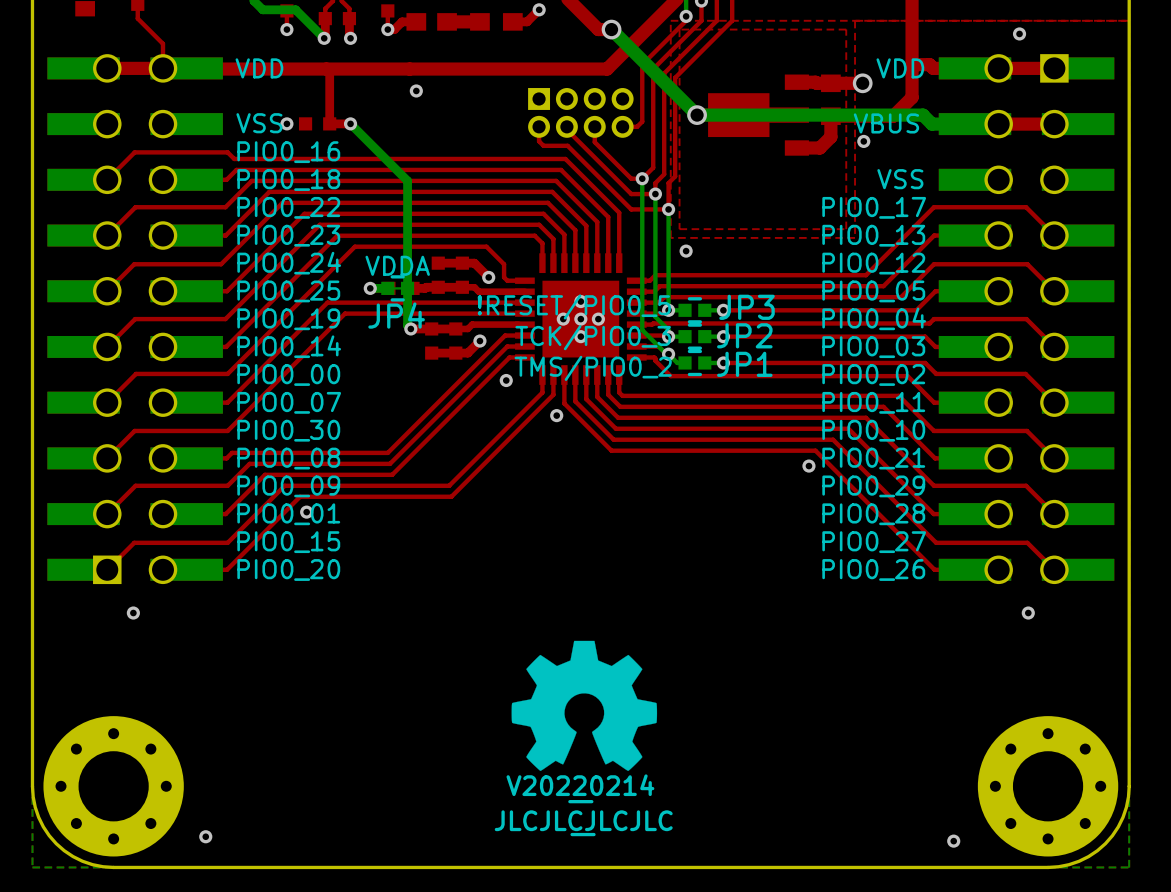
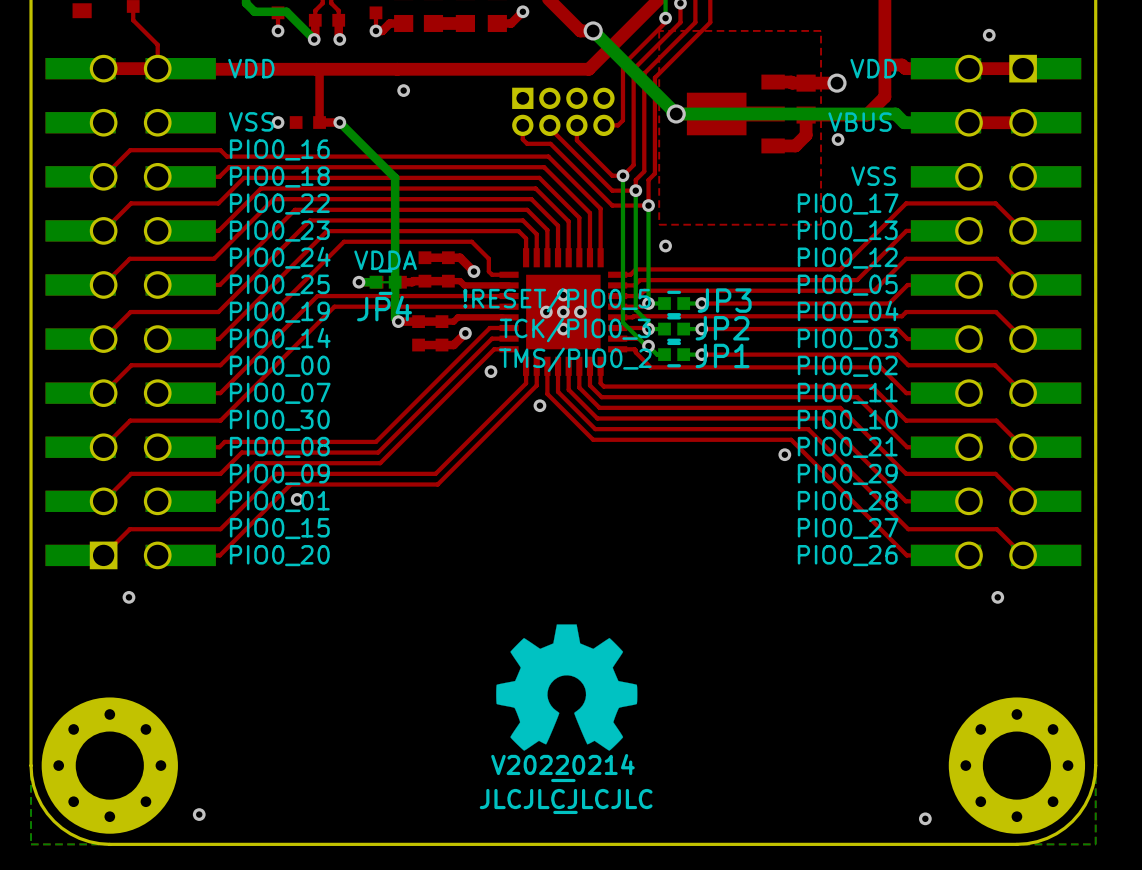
top zone outline: (1129, 20) (670, 20) (670, 237) (855, 237) (855, 20) -> none

